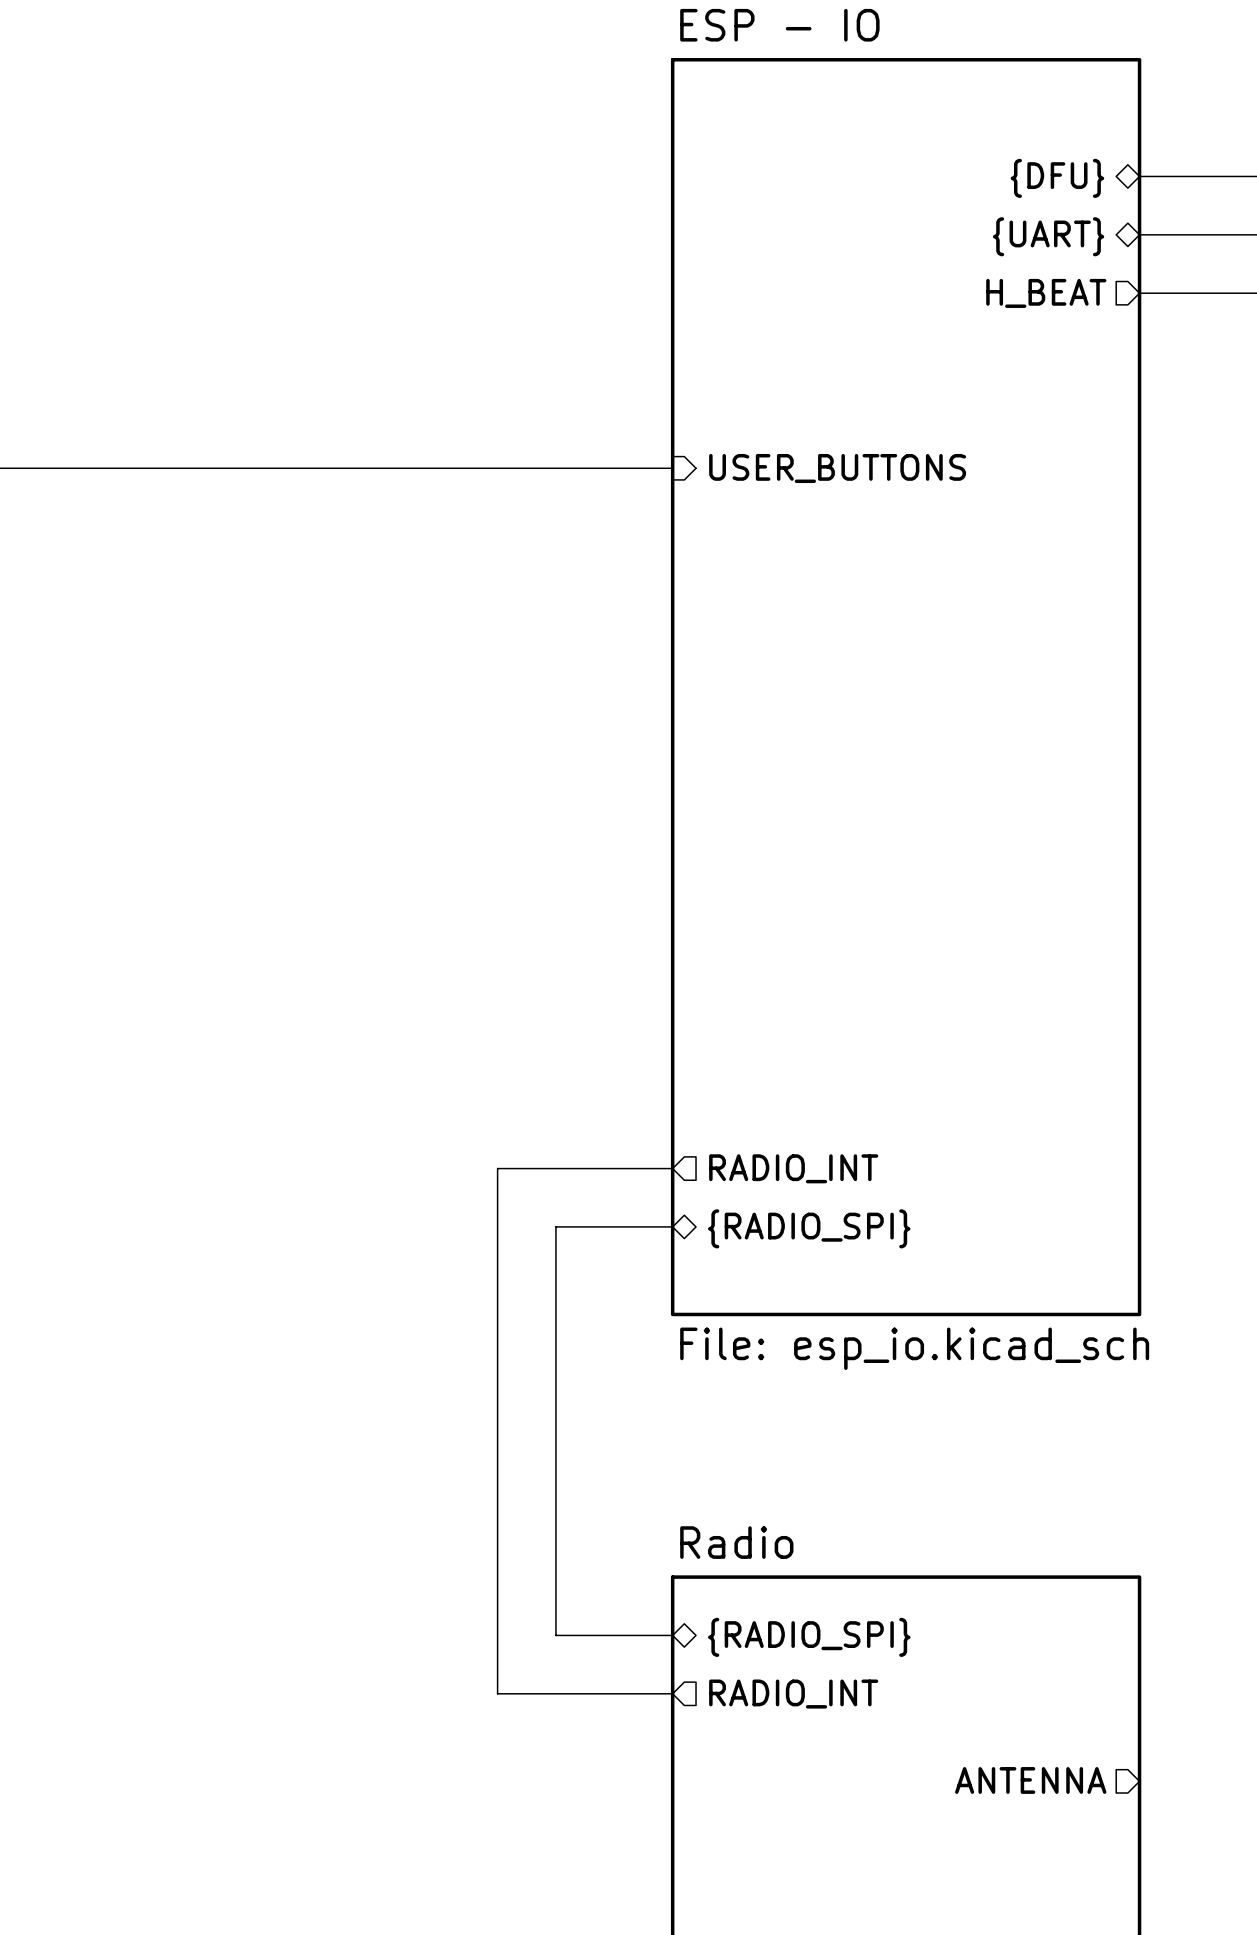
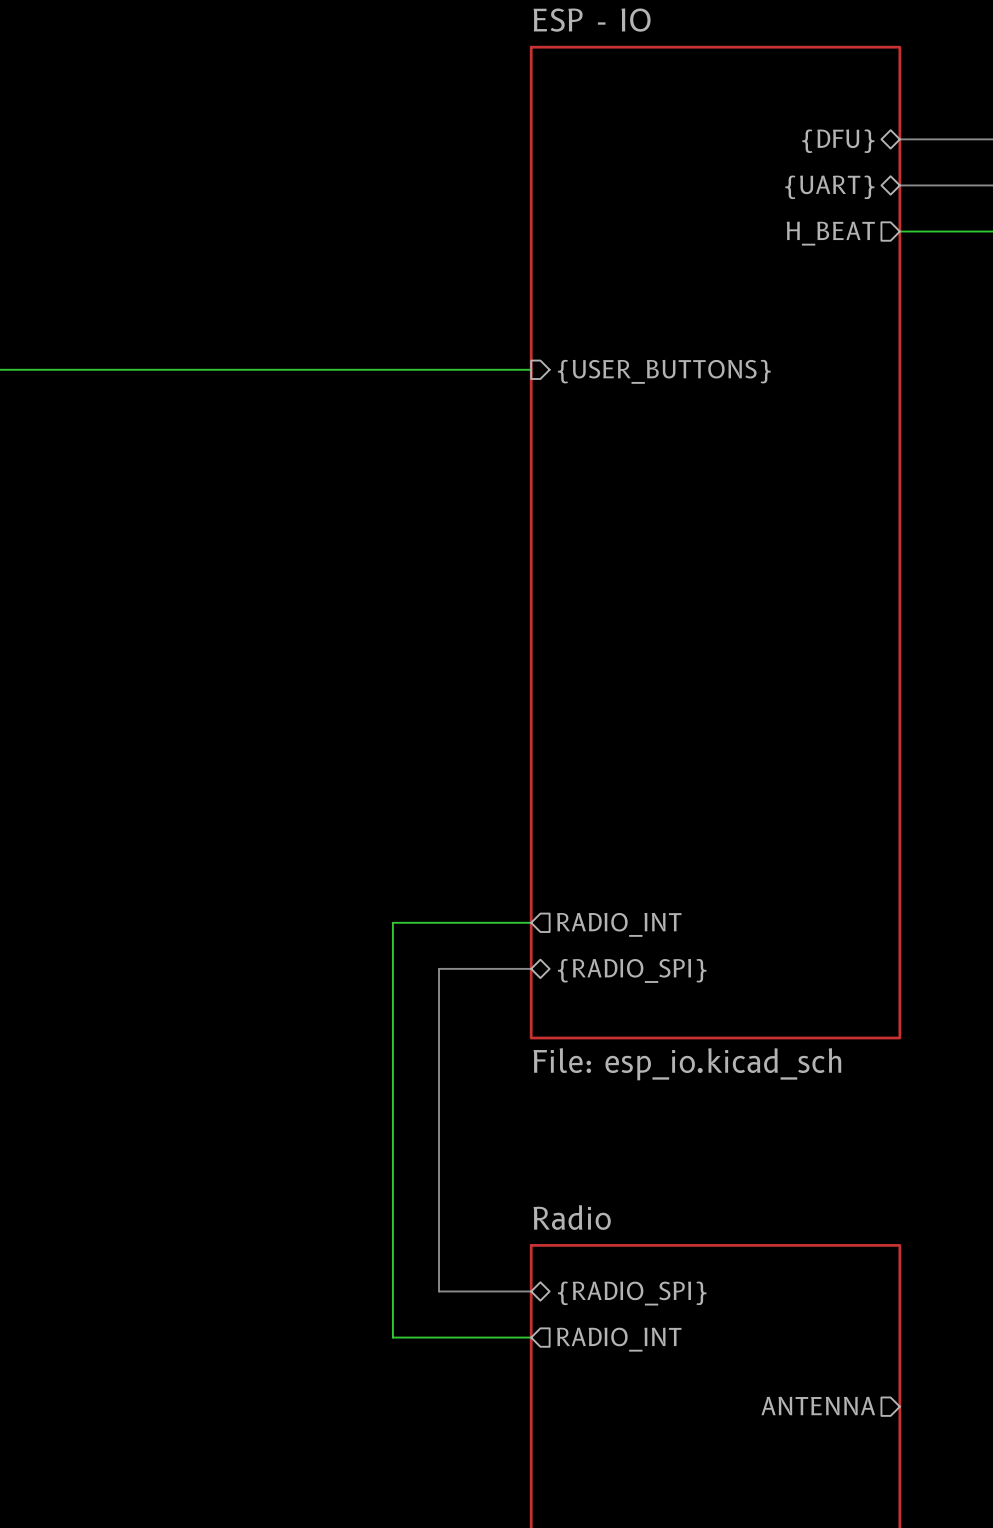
sheet pin: USER_BUTTONS (837, 468) -> {USER_BUTTONS} (664, 371)

